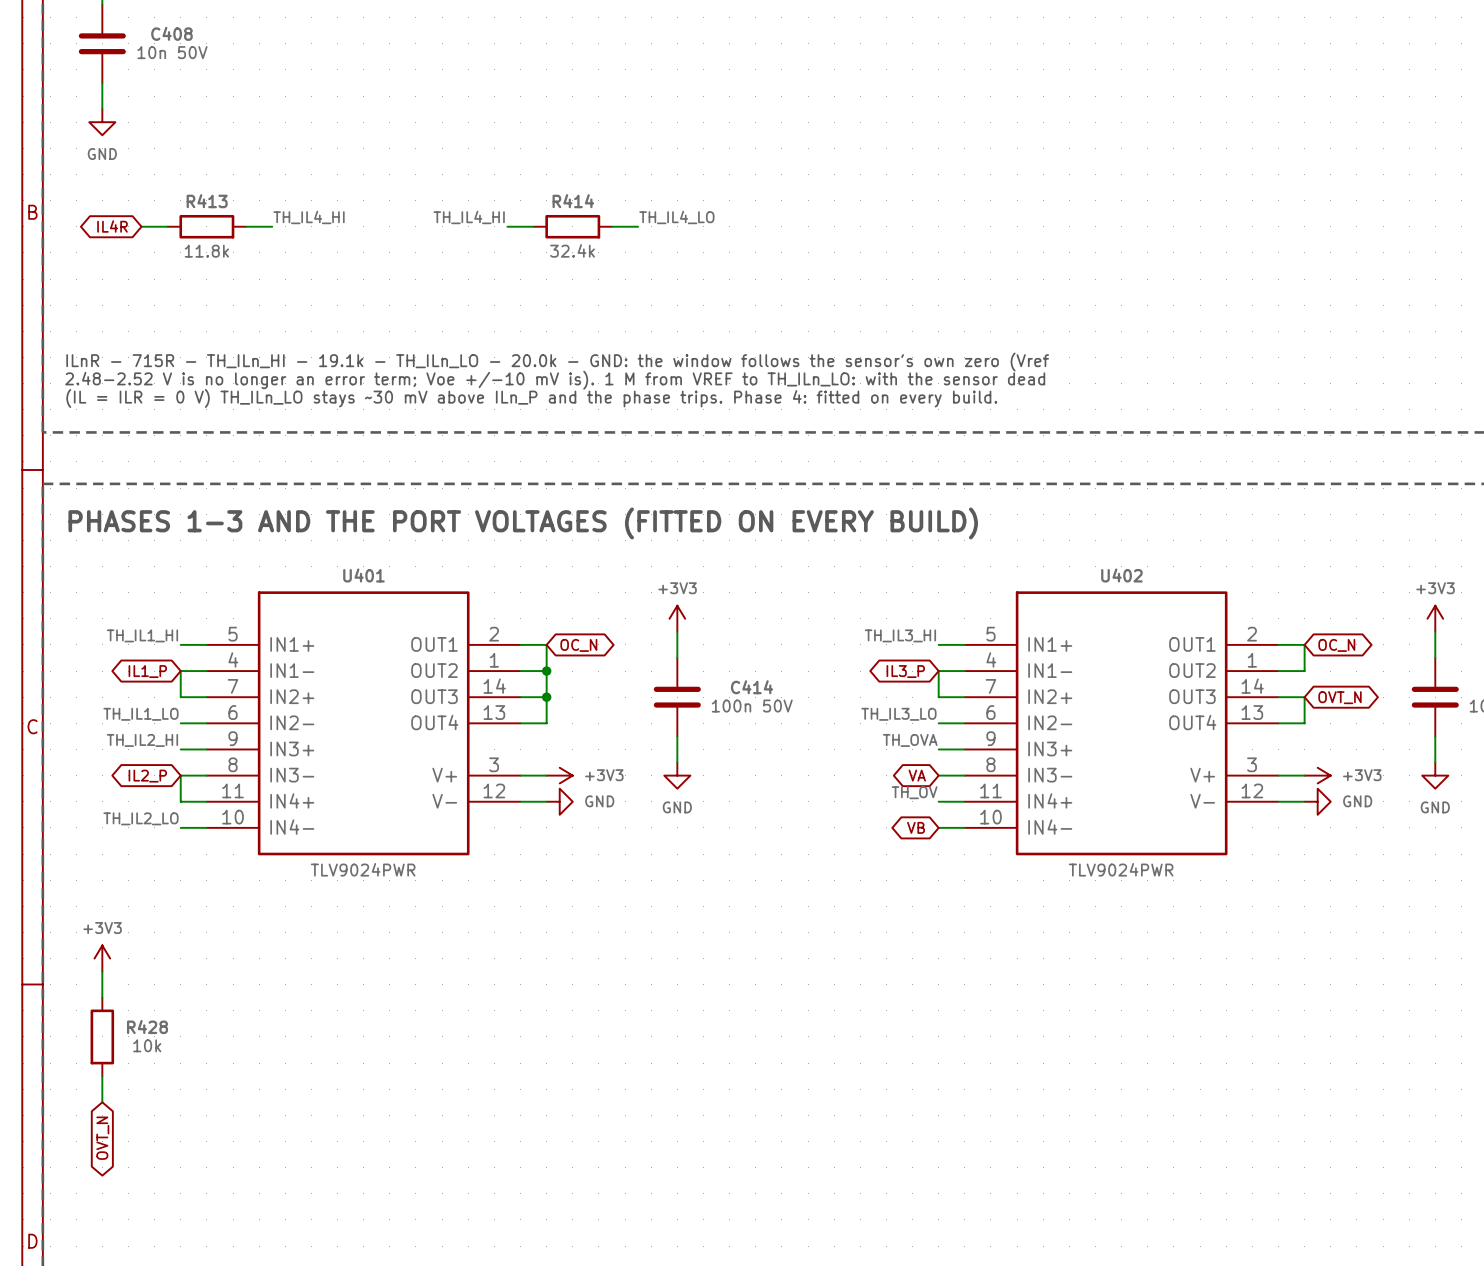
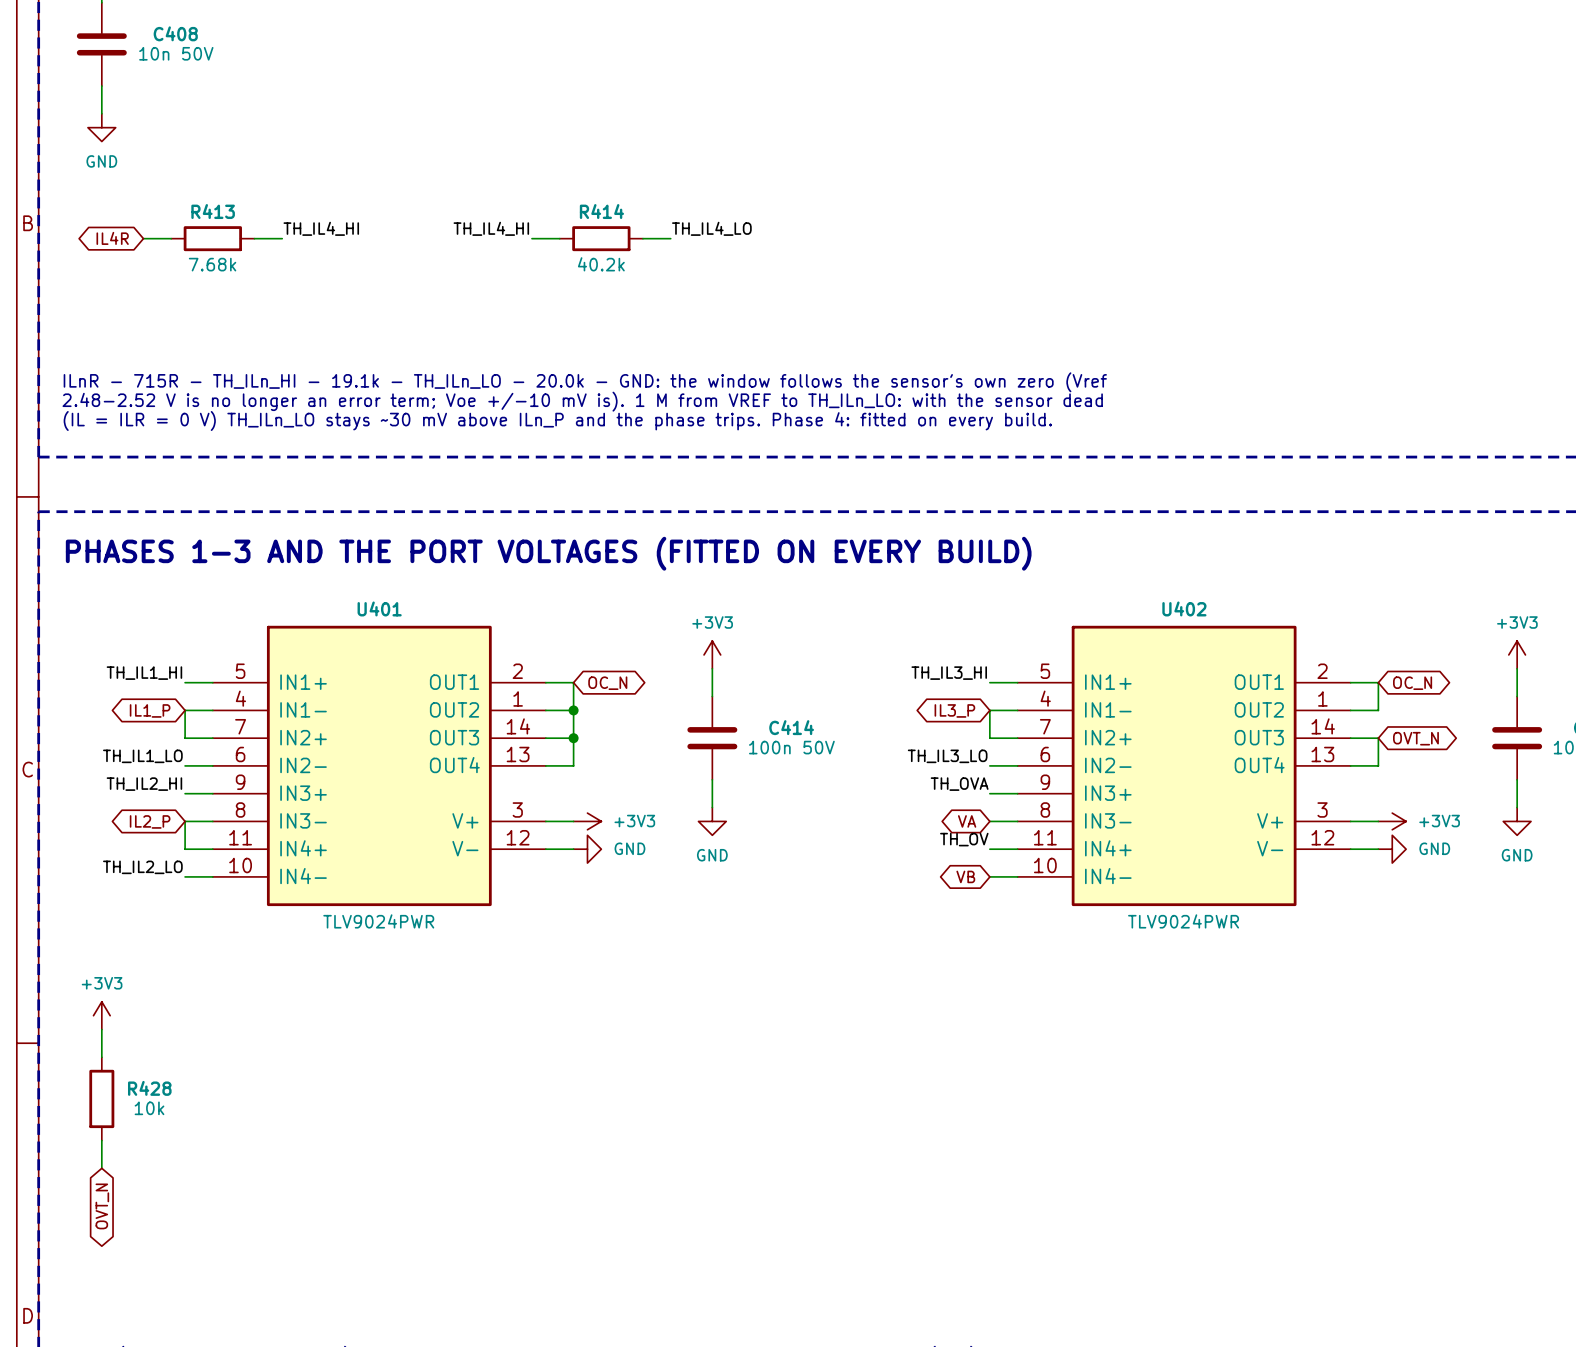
R414 value: 32.4k (572, 250) -> 40.2k (601, 264)
R413 value: 11.8k (206, 251) -> 7.68k (212, 264)

